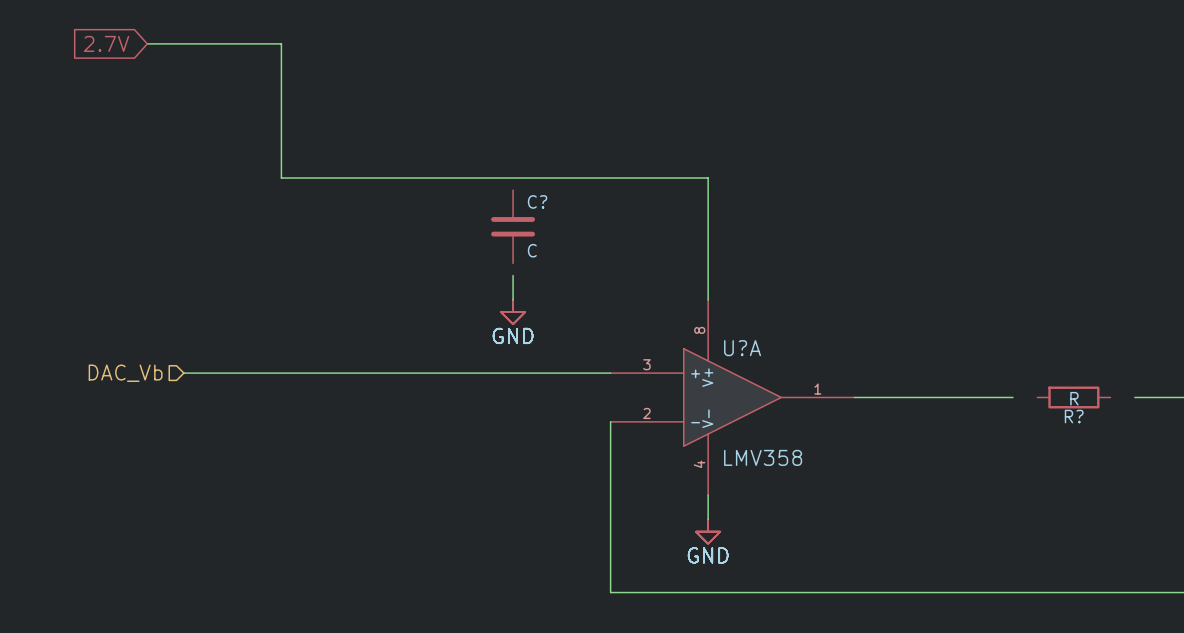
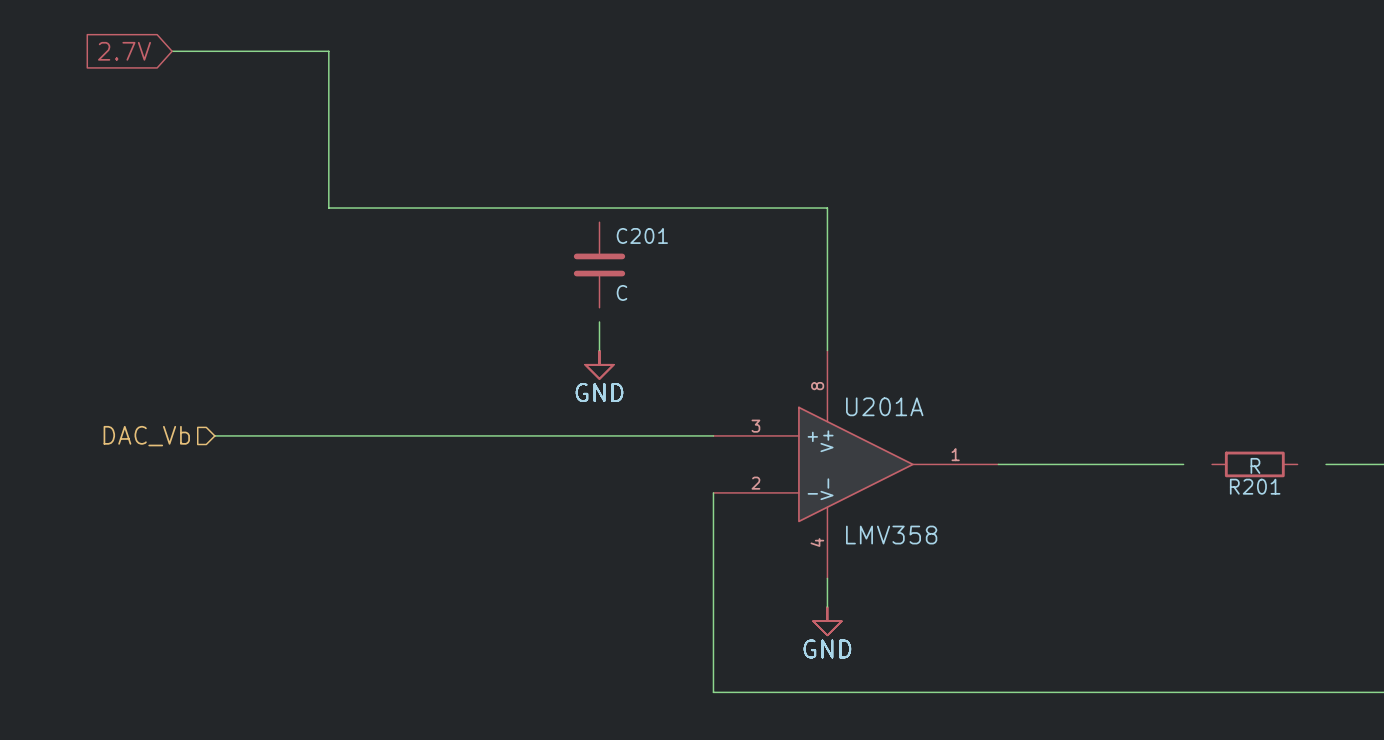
C? name: C? (537, 201) -> C201 (642, 235)
U?A name: U?A (742, 348) -> U201A (884, 406)
R? name: R? (1074, 416) -> R201 (1255, 486)

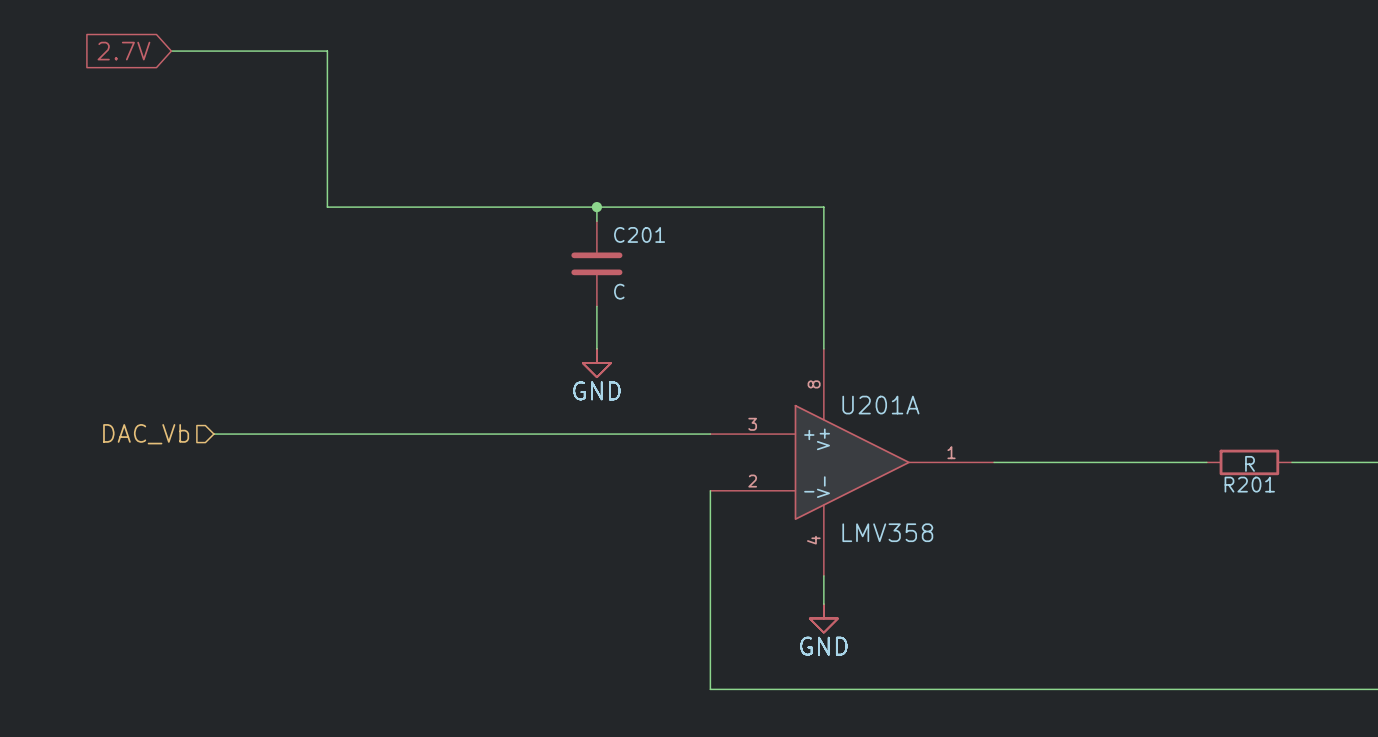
wire: none -> (596, 207) (596, 221)
junction: none -> (596, 207)
wire: none -> (596, 306) (596, 320)
wire: none -> (1178, 462) (1206, 462)
wire: none -> (1291, 462) (1320, 462)

